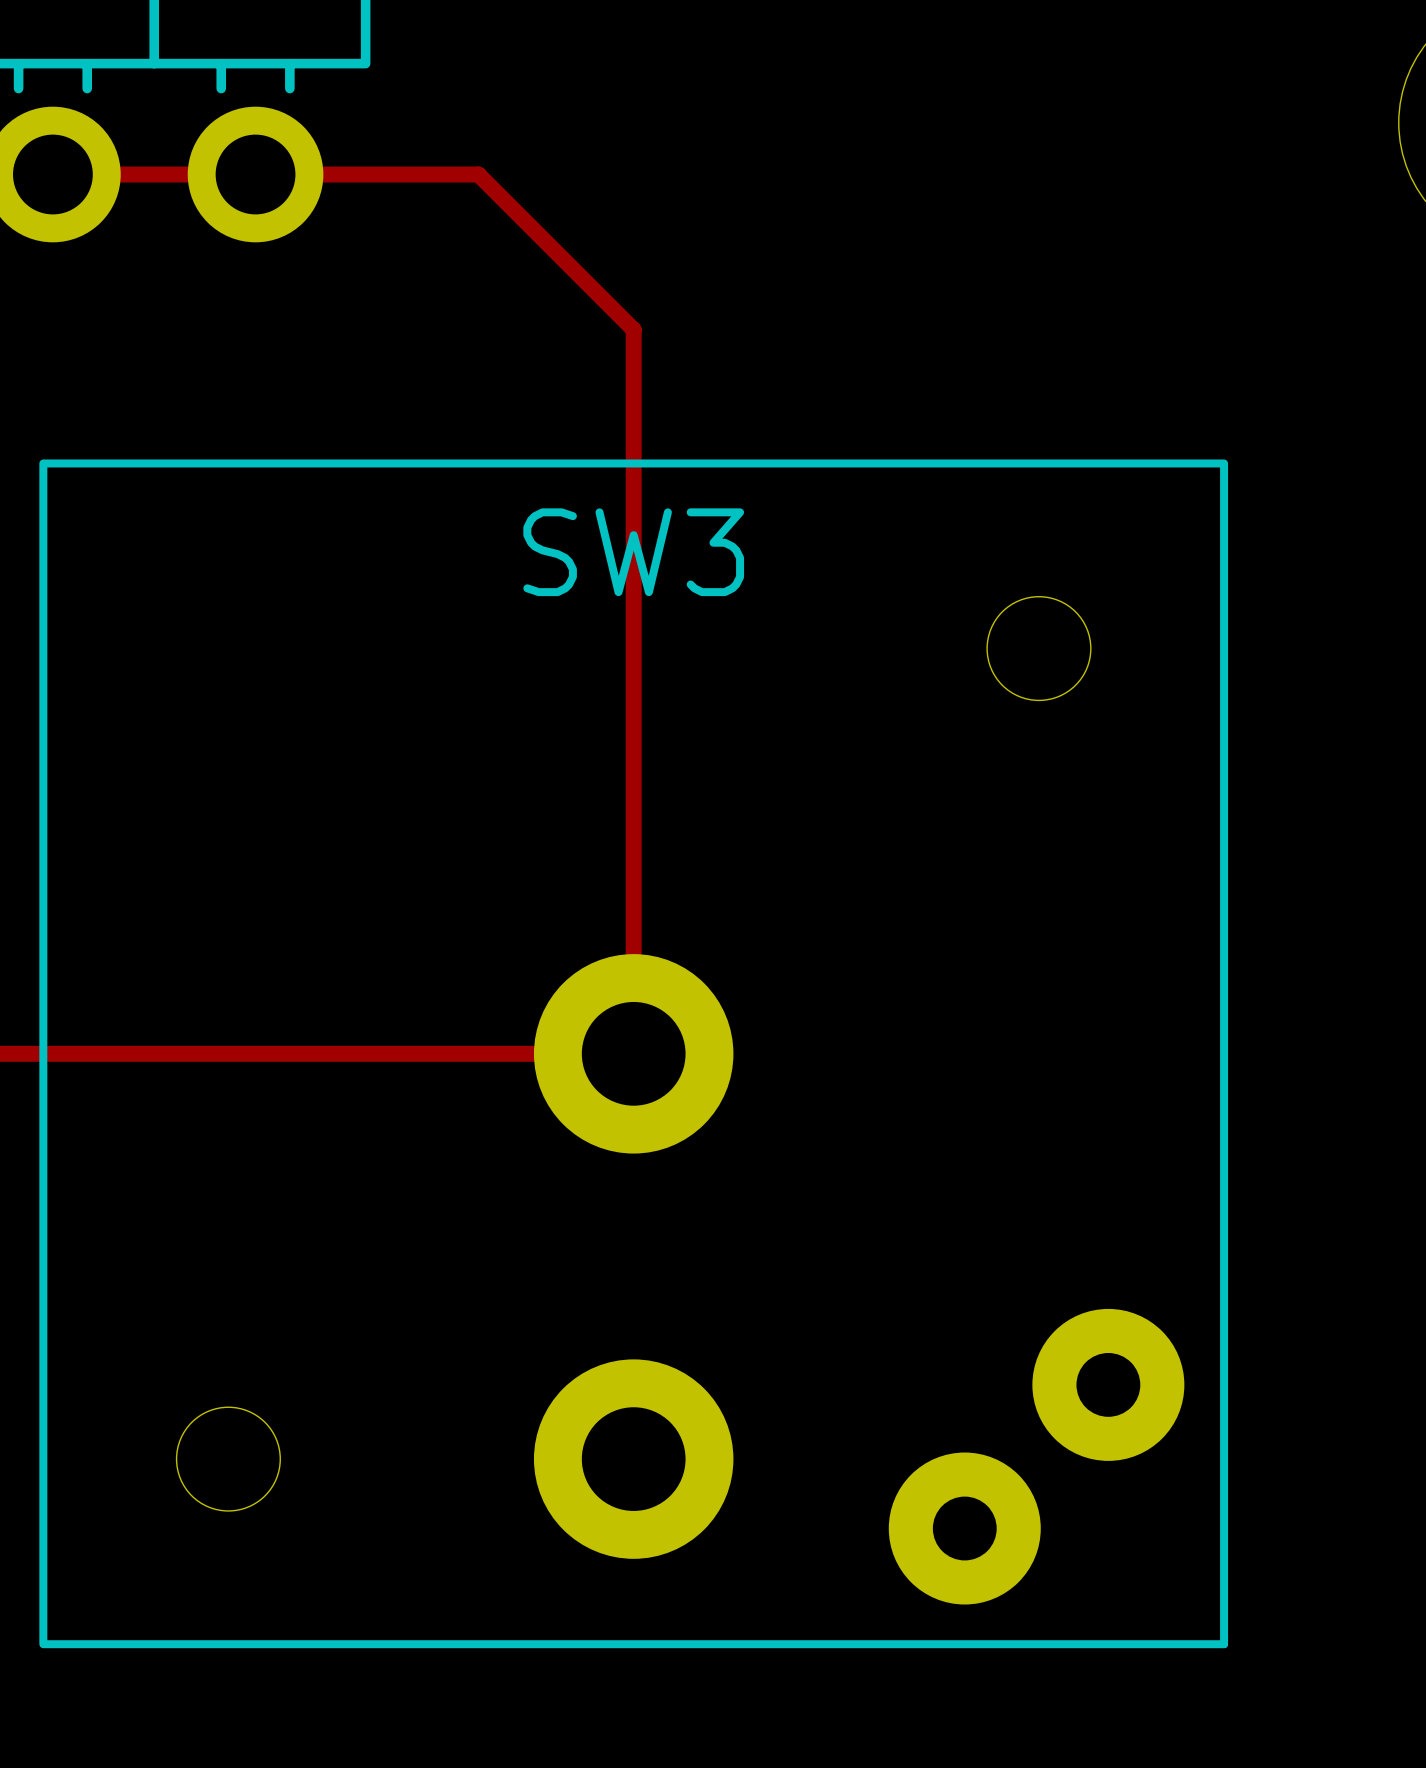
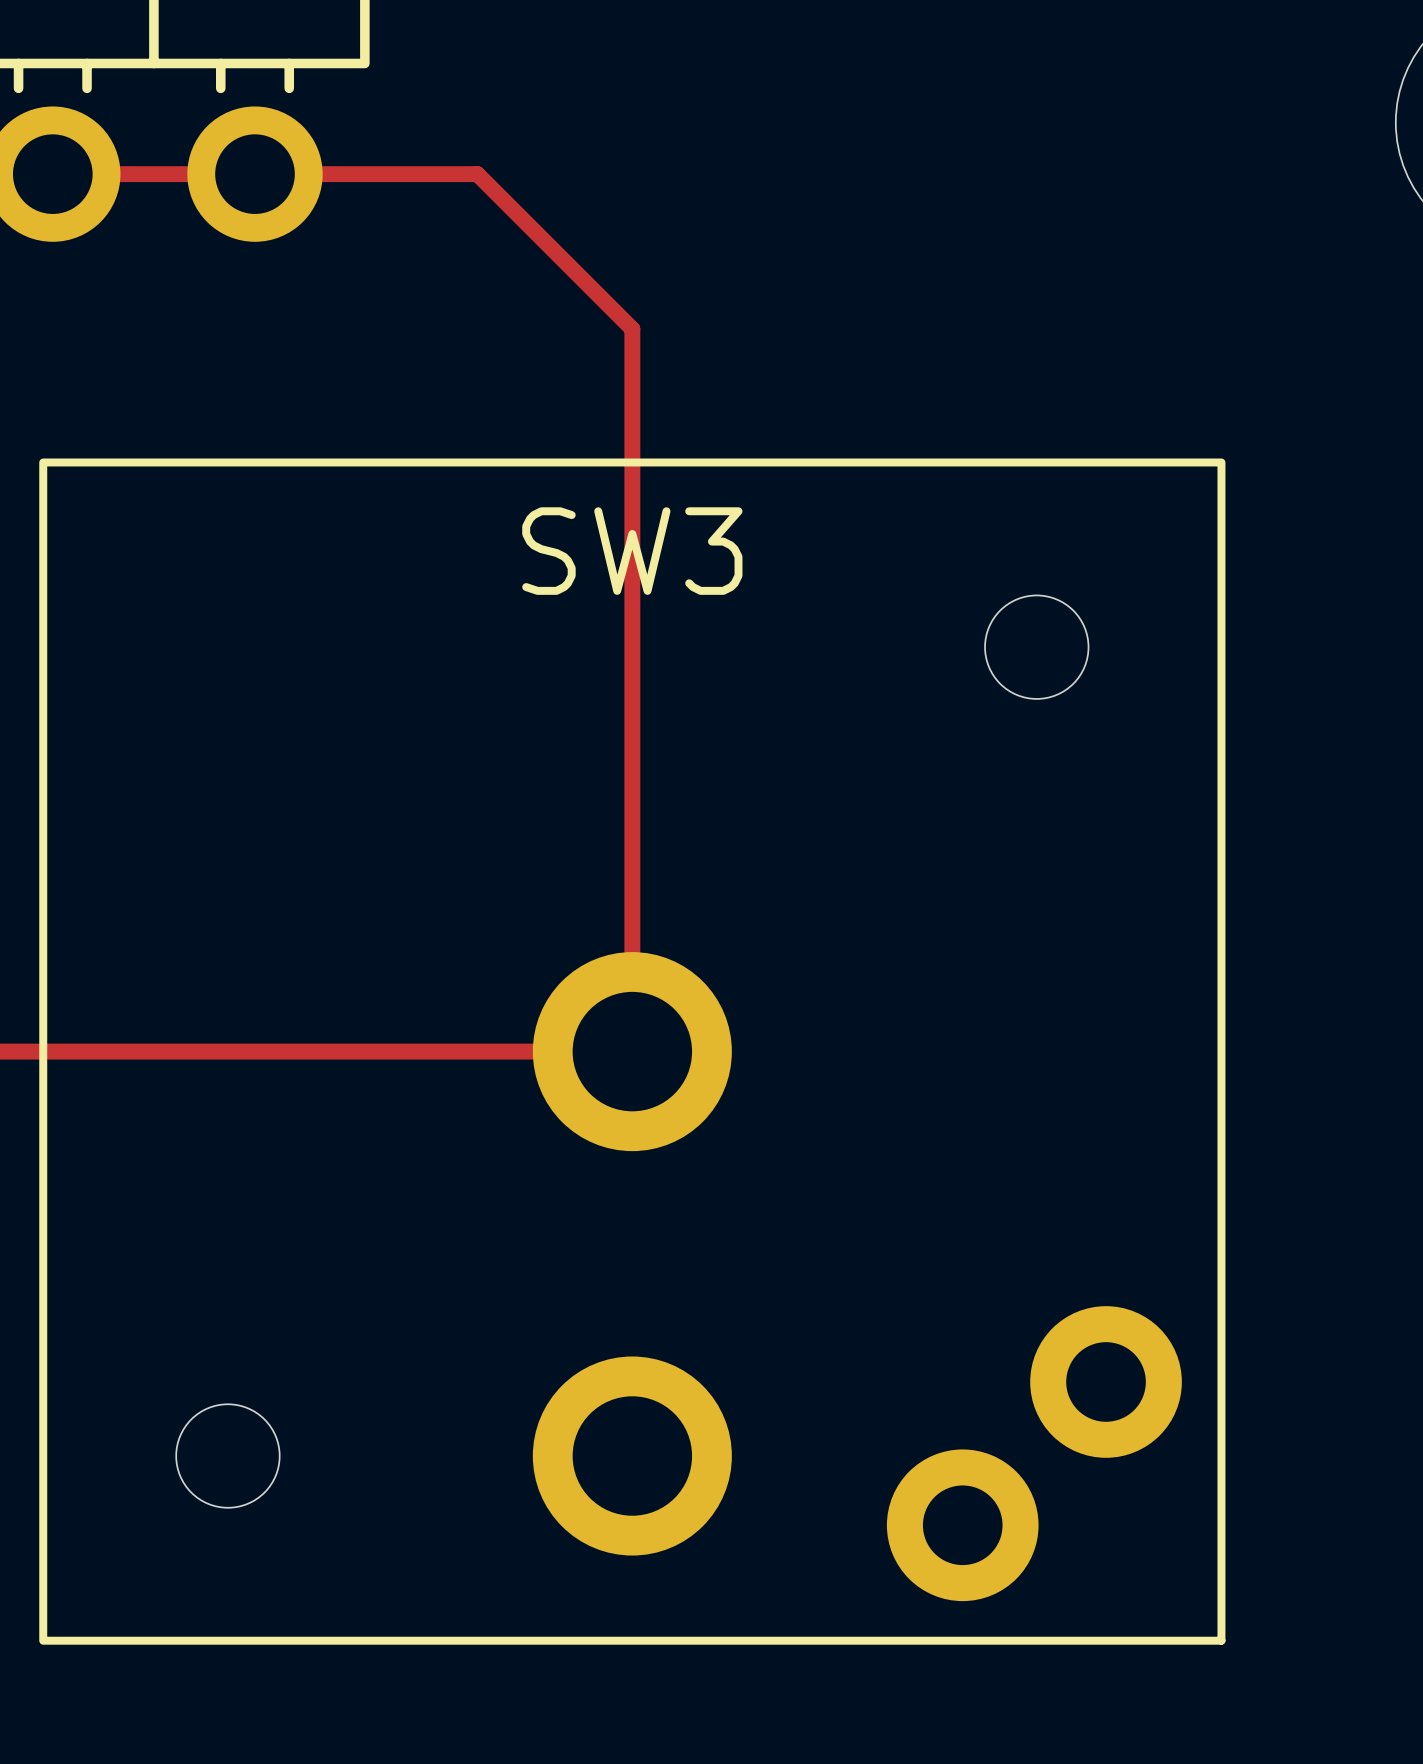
SW3 footprint: [39, 459, 1229, 1649] -> [39, 458, 1226, 1645]

